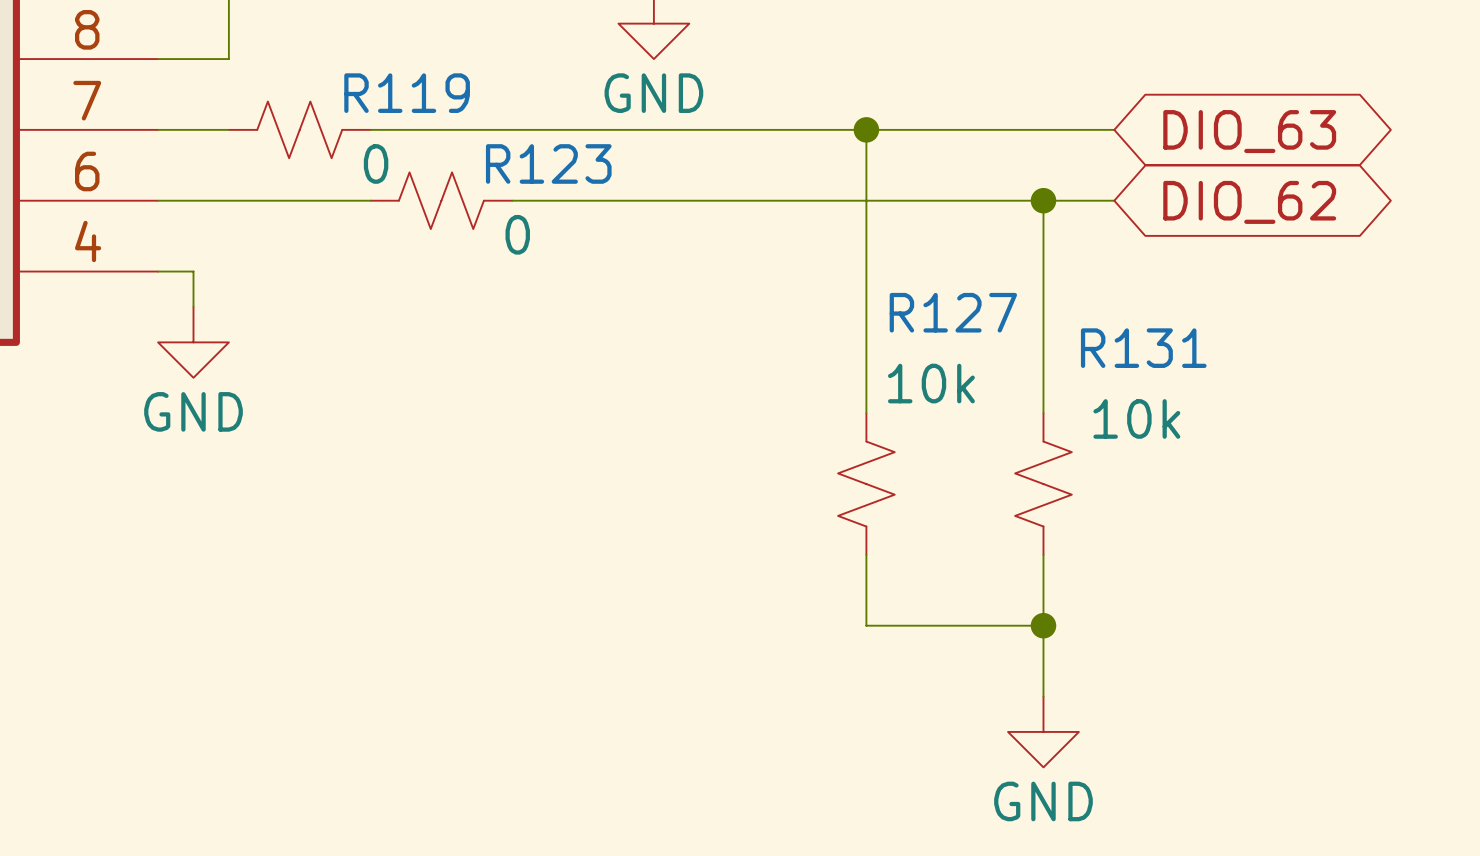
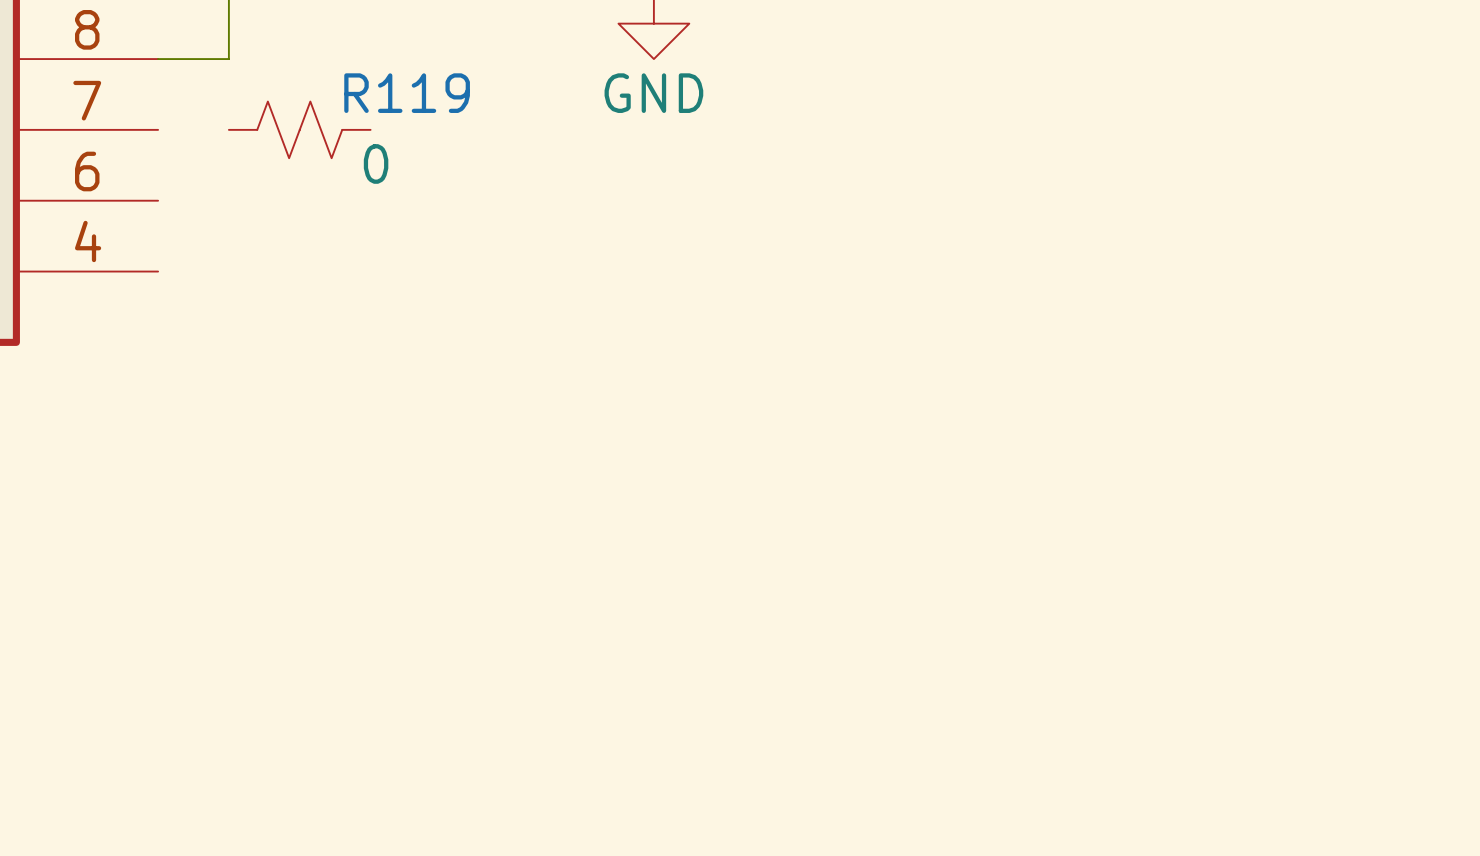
wire: (158, 129) (228, 129) -> none
wire: (370, 129) (1114, 129) -> none
wire: (866, 129) (866, 413) -> none
junction: (866, 129) -> none
global label: DIO_63 (1249, 131) -> none
wire: (158, 200) (370, 200) -> none
R123: 0 (441, 200) -> none
wire: (512, 200) (1114, 200) -> none
wire: (1043, 200) (1043, 413) -> none
junction: (1043, 200) -> none
global label: DIO_62 (1249, 202) -> none
wire: (158, 271) (193, 271) (193, 306) -> none
power symbol: GND (193, 342) -> none
R127: 10k (866, 484) -> none
R131: 10k (1043, 484) -> none
wire: (866, 554) (866, 625) (1043, 625) -> none
wire: (1043, 554) (1043, 696) -> none
junction: (1043, 625) -> none
power symbol: GND (1043, 731) -> none

